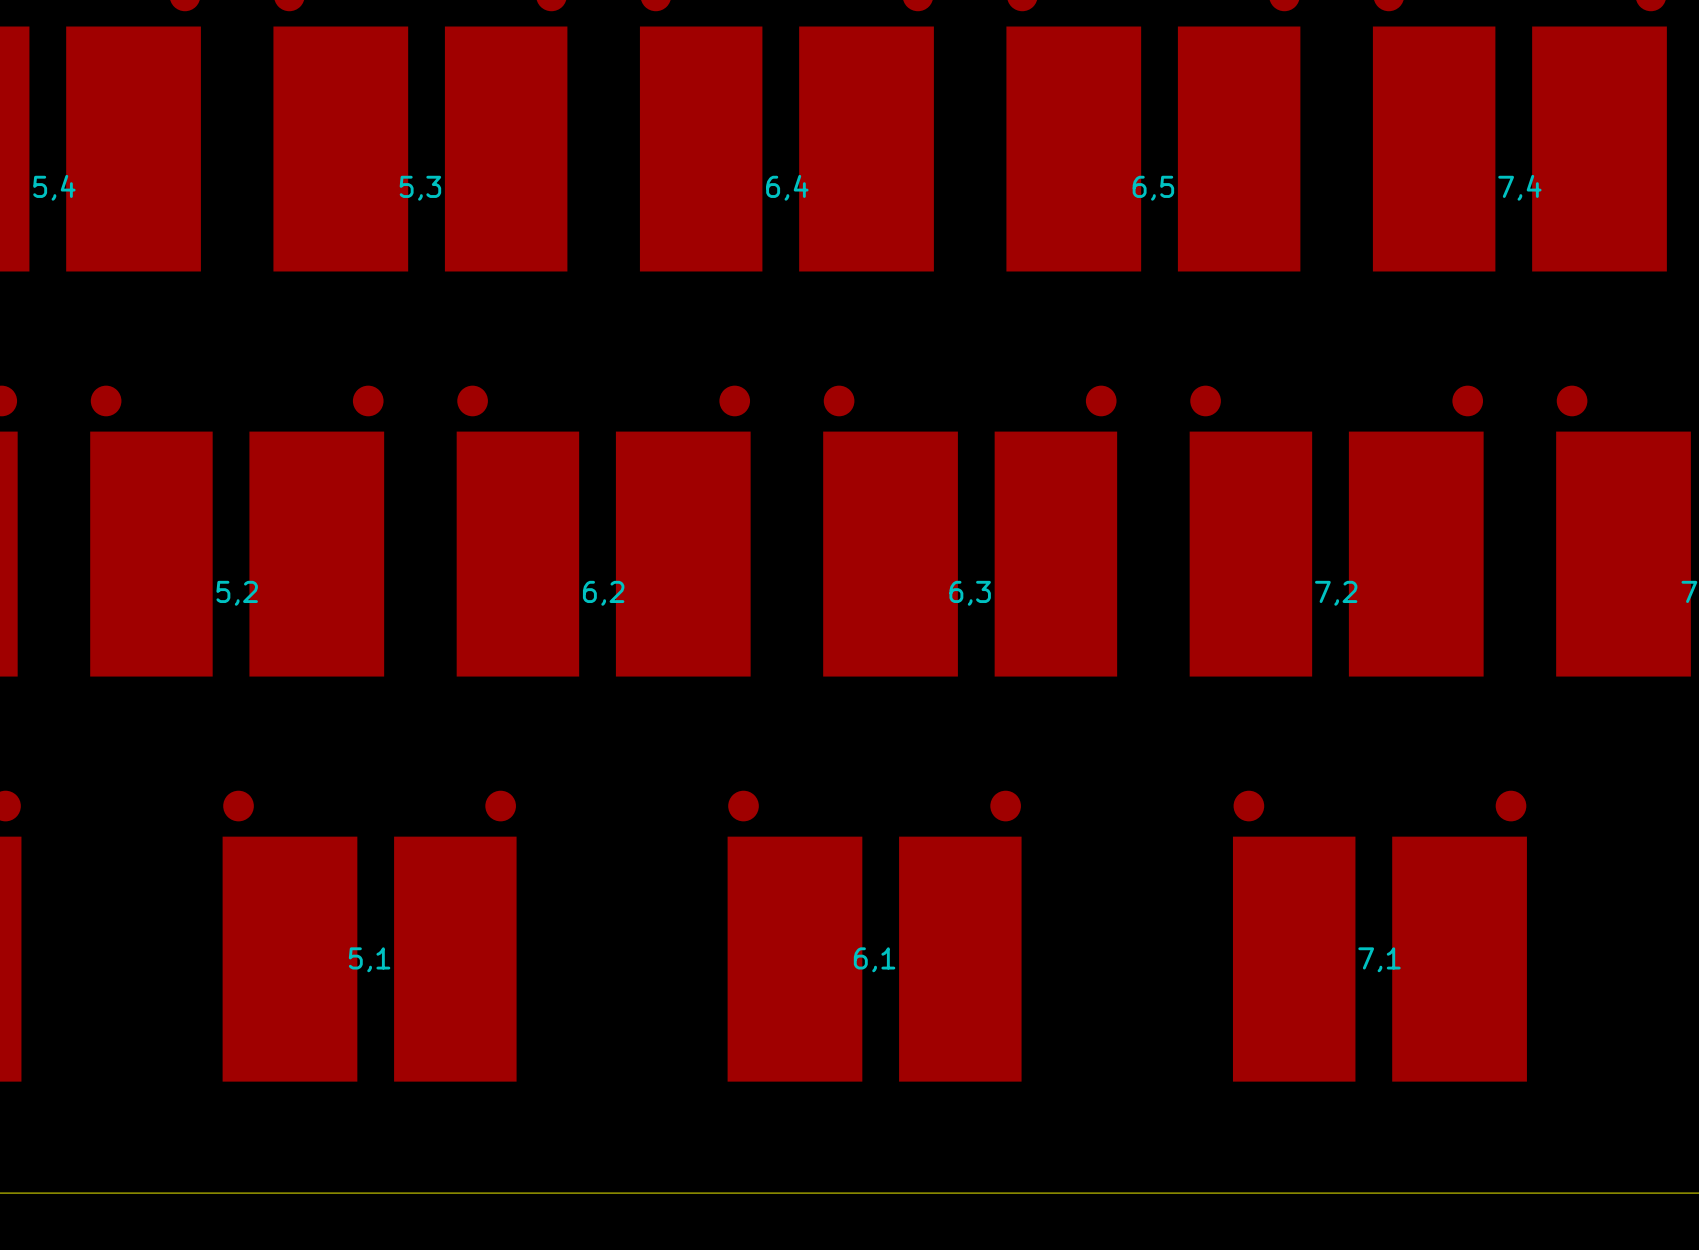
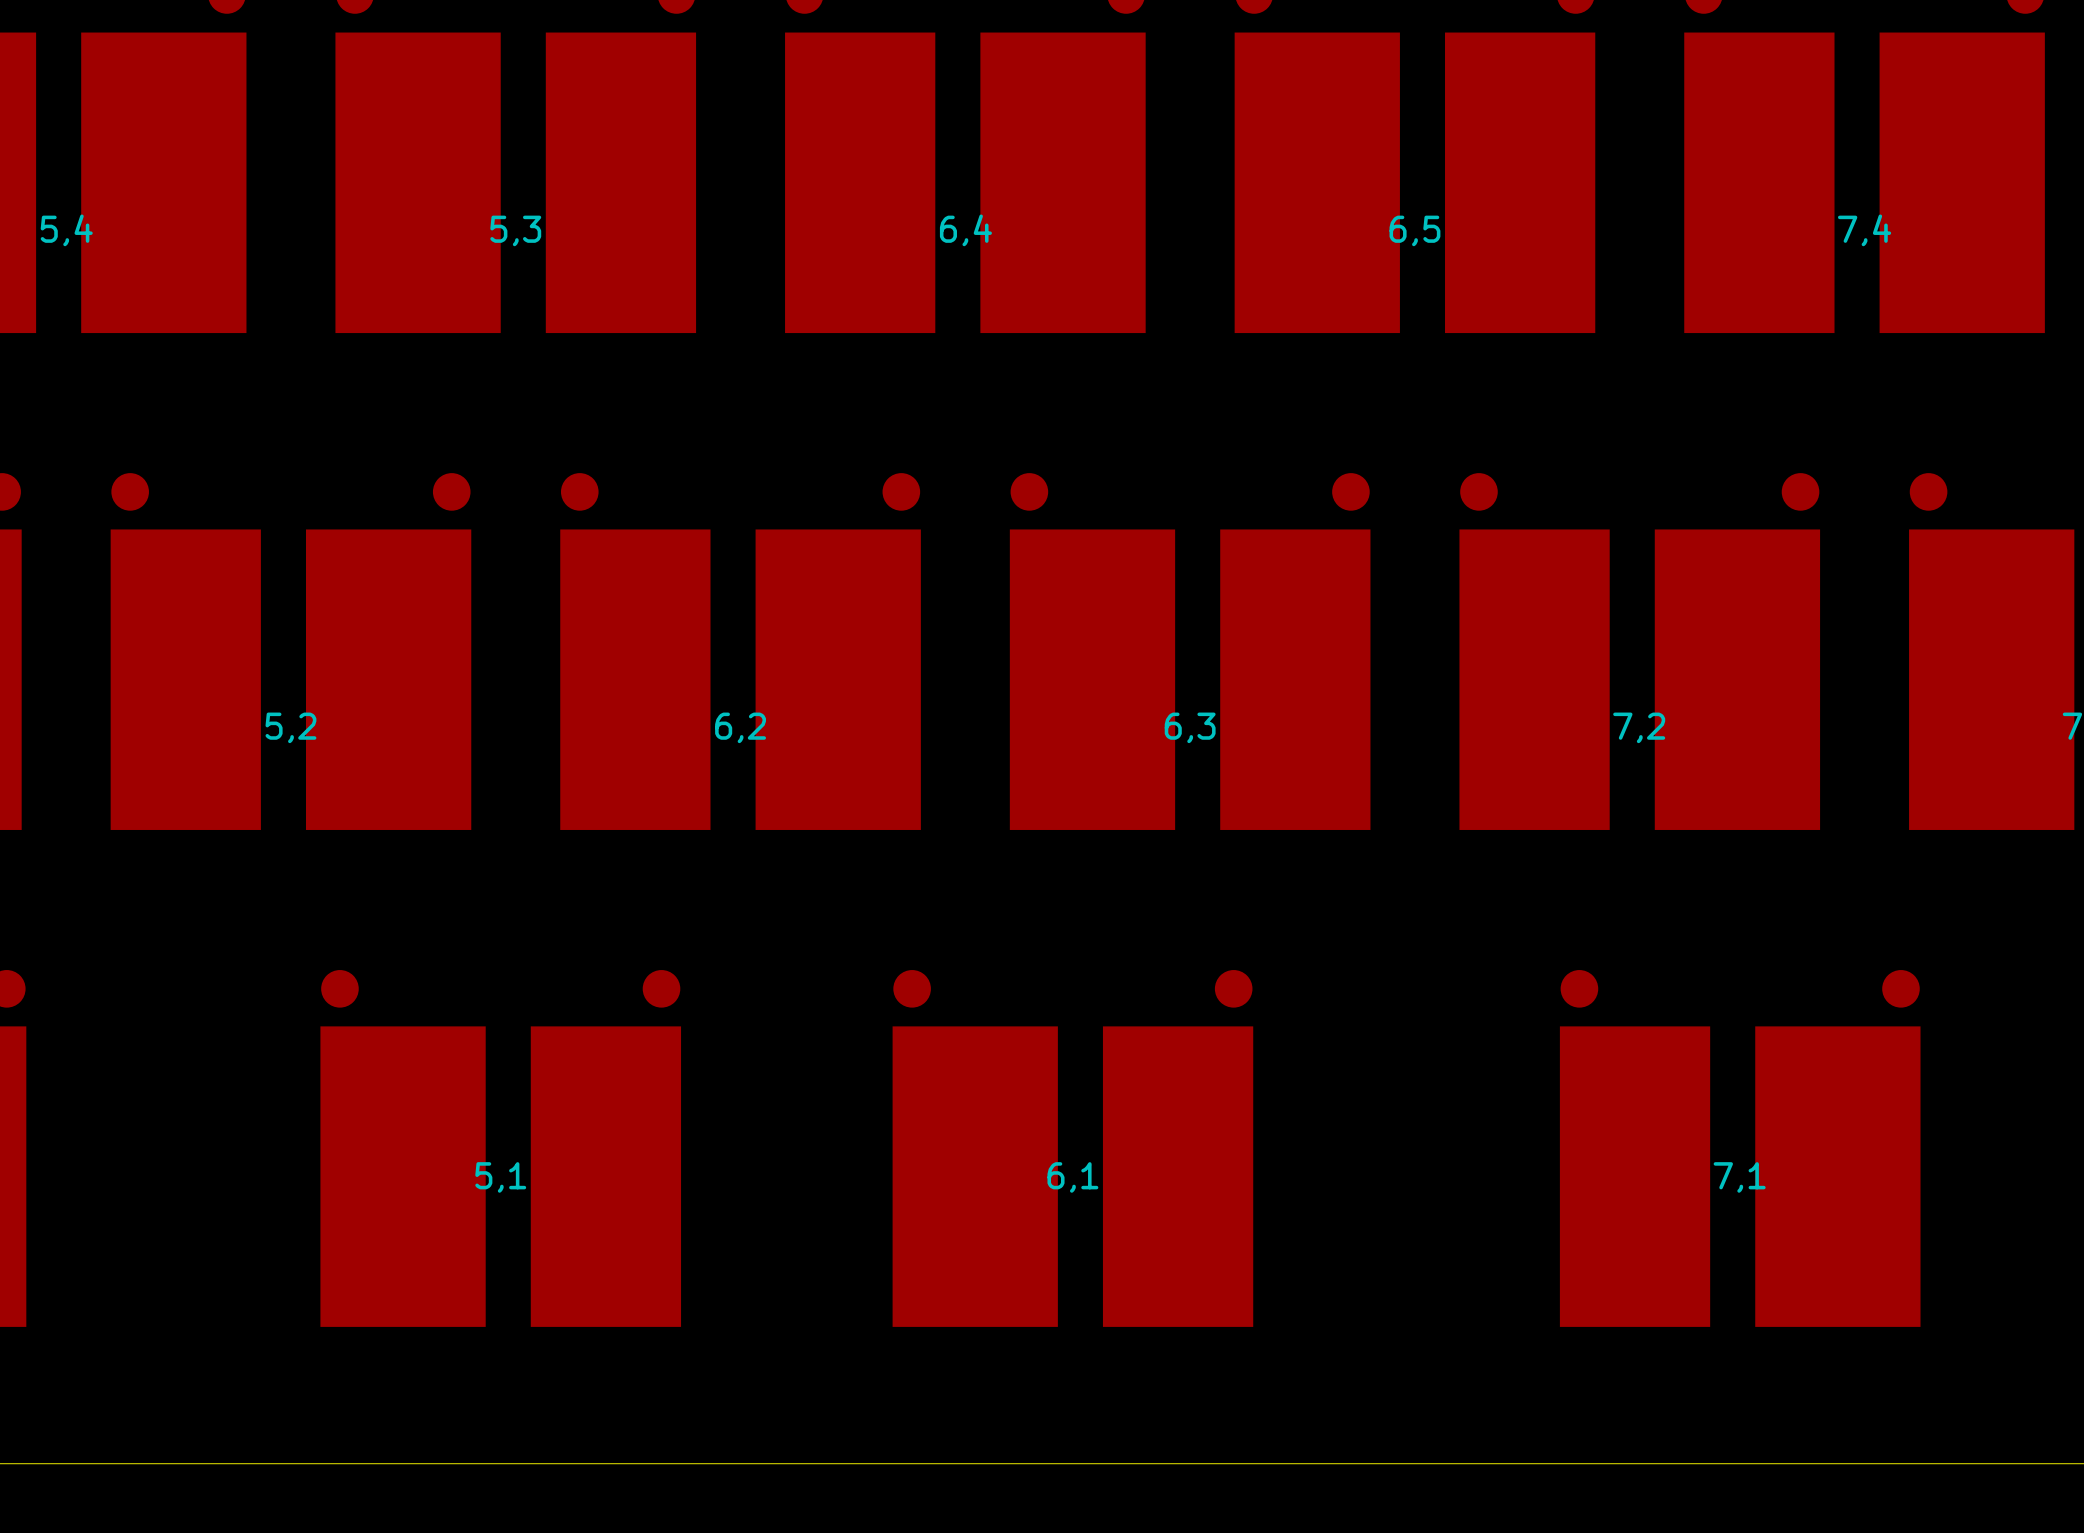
part position: (369, 936) -> (500, 1148)
part position: (1379, 936) -> (1740, 1148)

